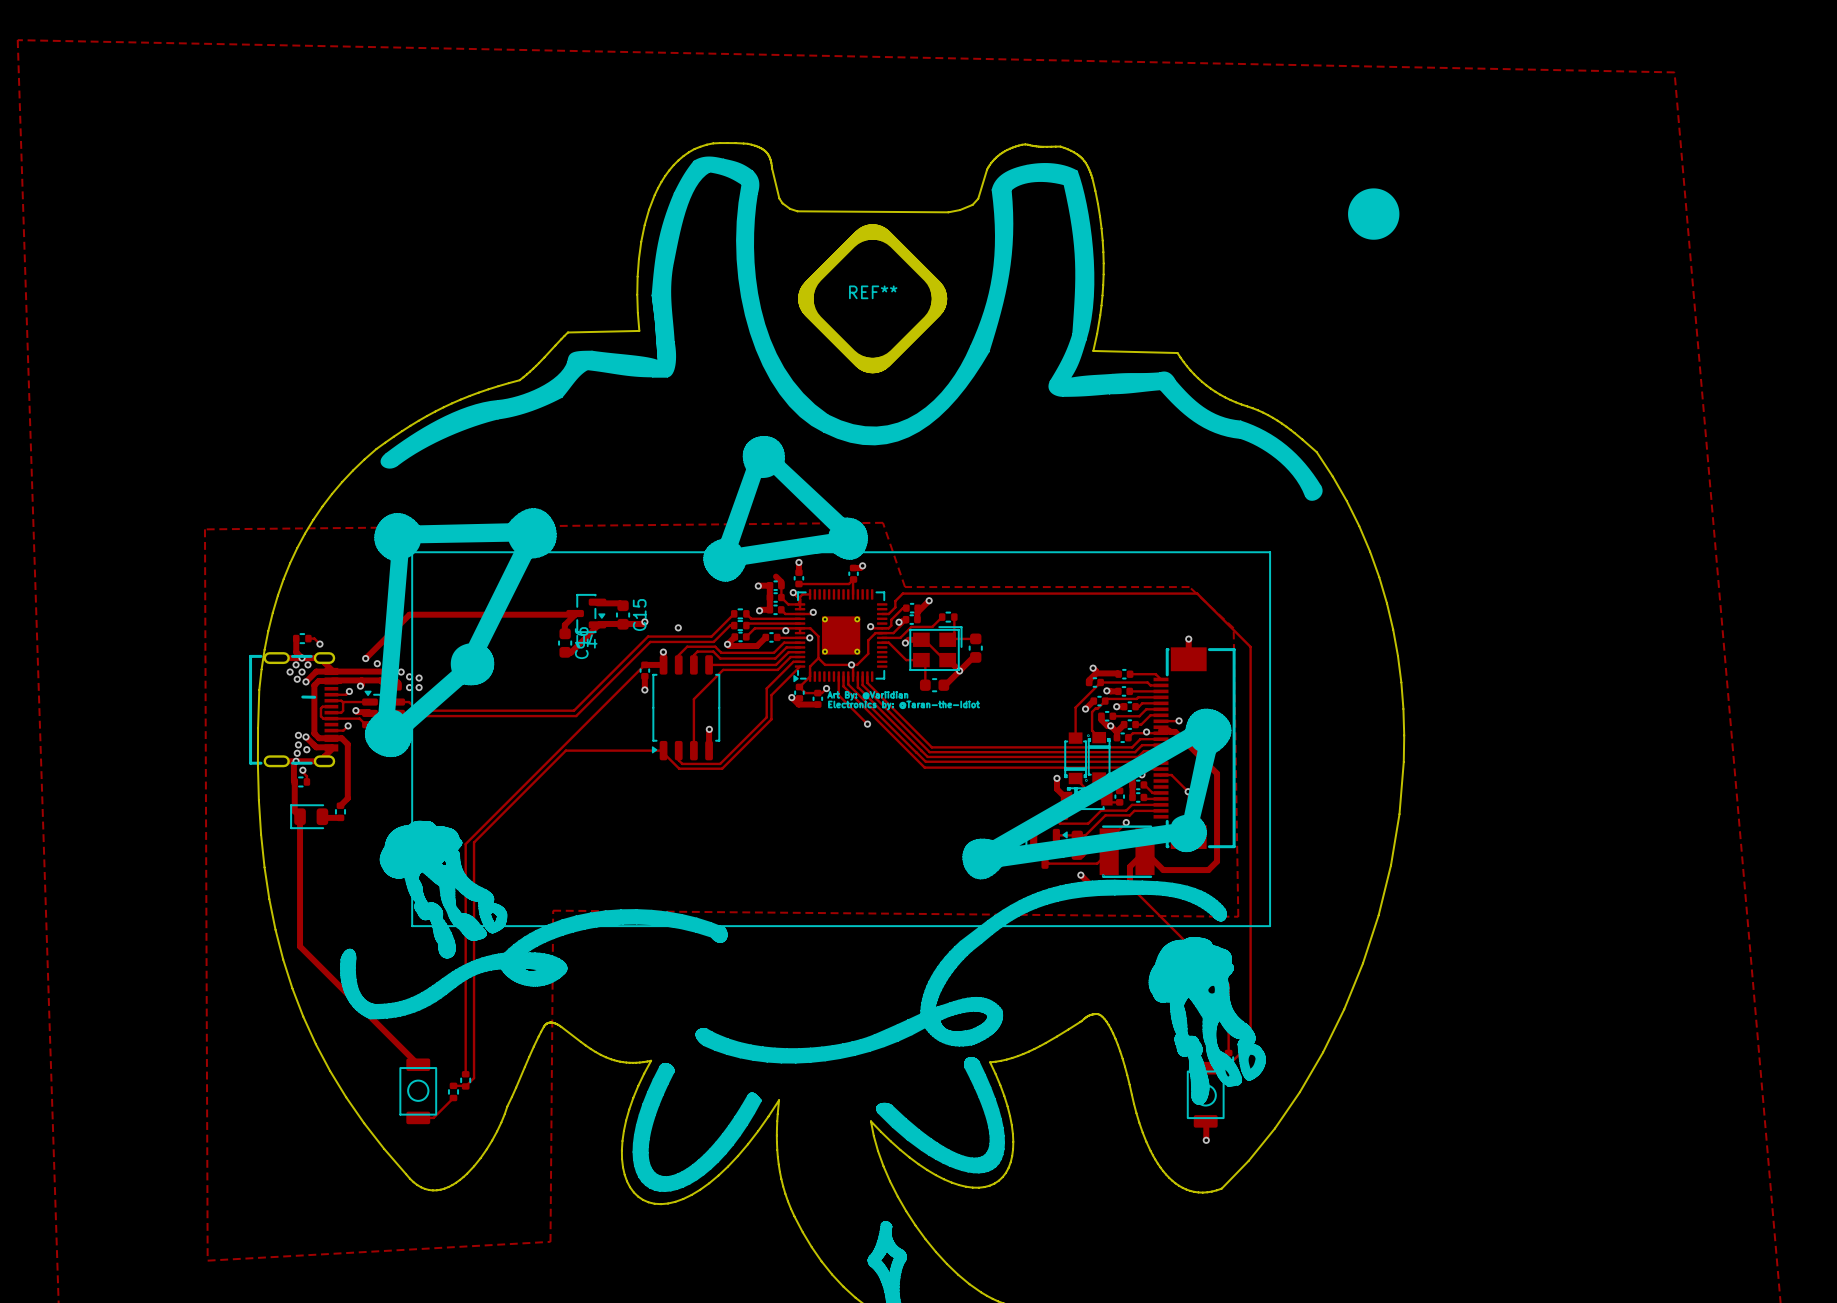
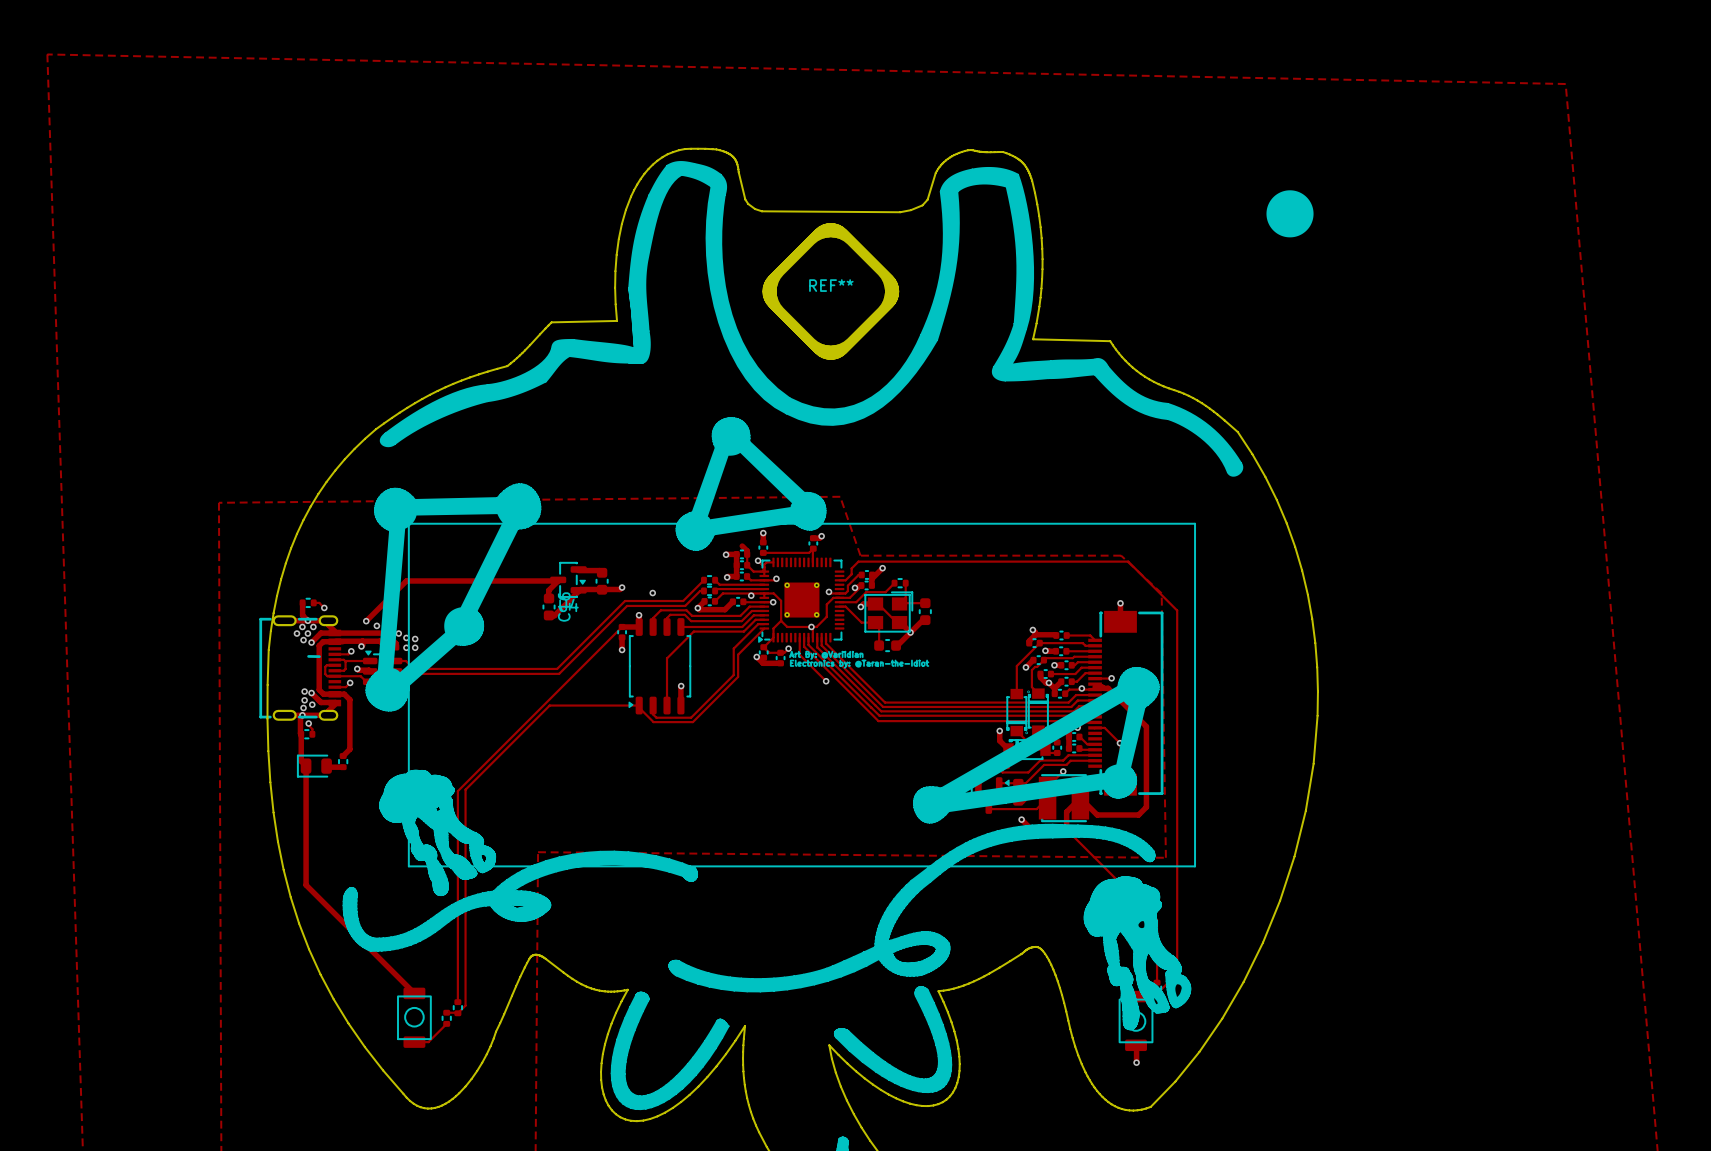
C15 name: C15 (639, 615) -> none

